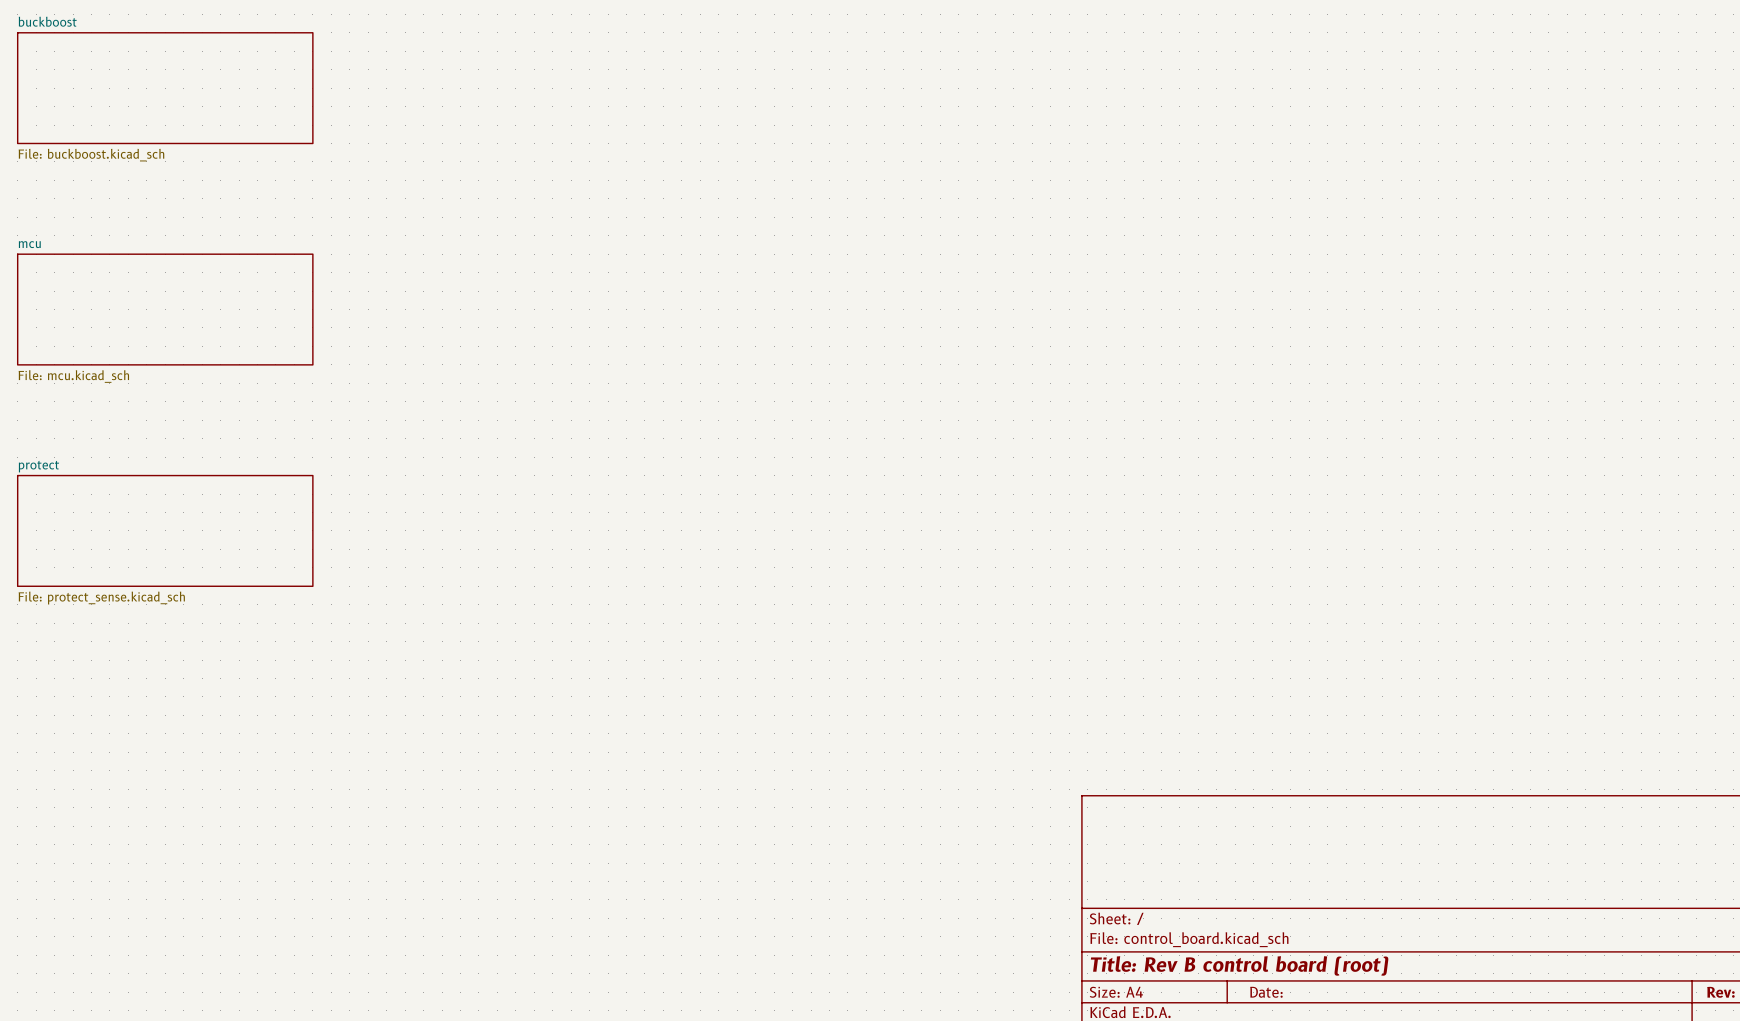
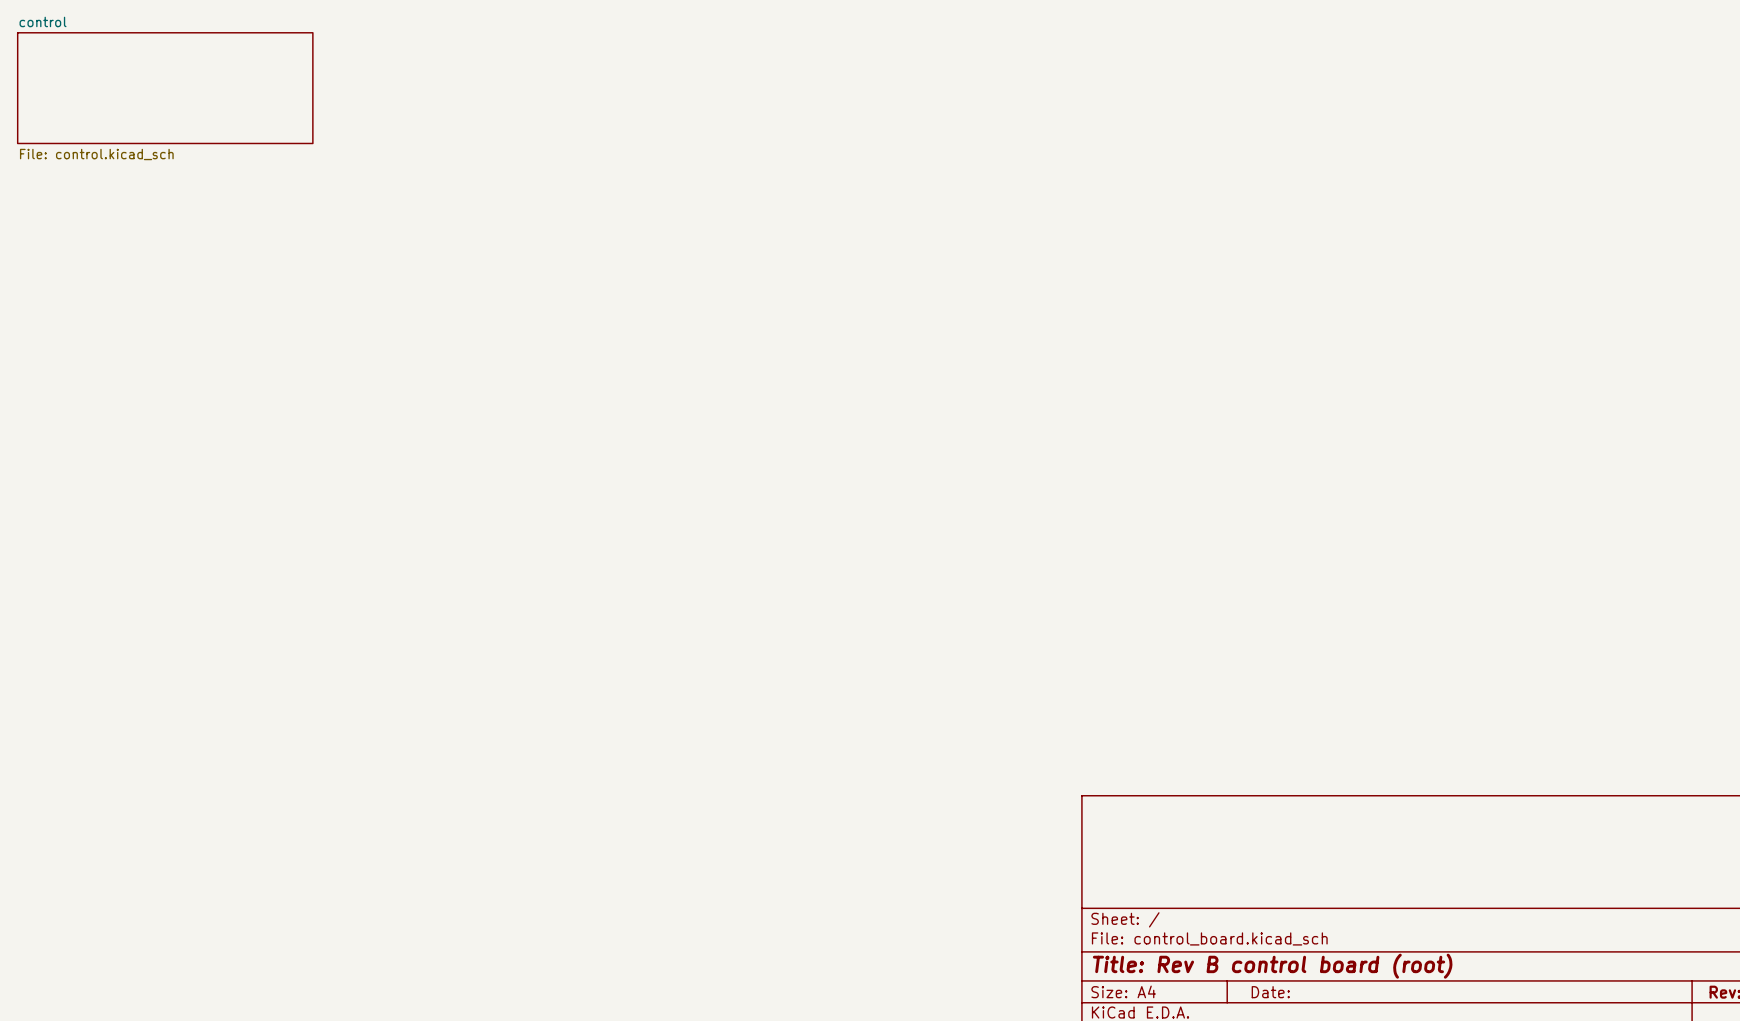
sheet buckboost name: buckboost (47, 21) -> control (43, 21)
sheet buckboost value: File: buckboost.kicad_sch (91, 155) -> File: control.kicad_sch (96, 154)
sheet mcu: File: mcu.kicad_sch (165, 309) -> none
sheet protect: File: protect_sense.kicad_sch (165, 530) -> none

